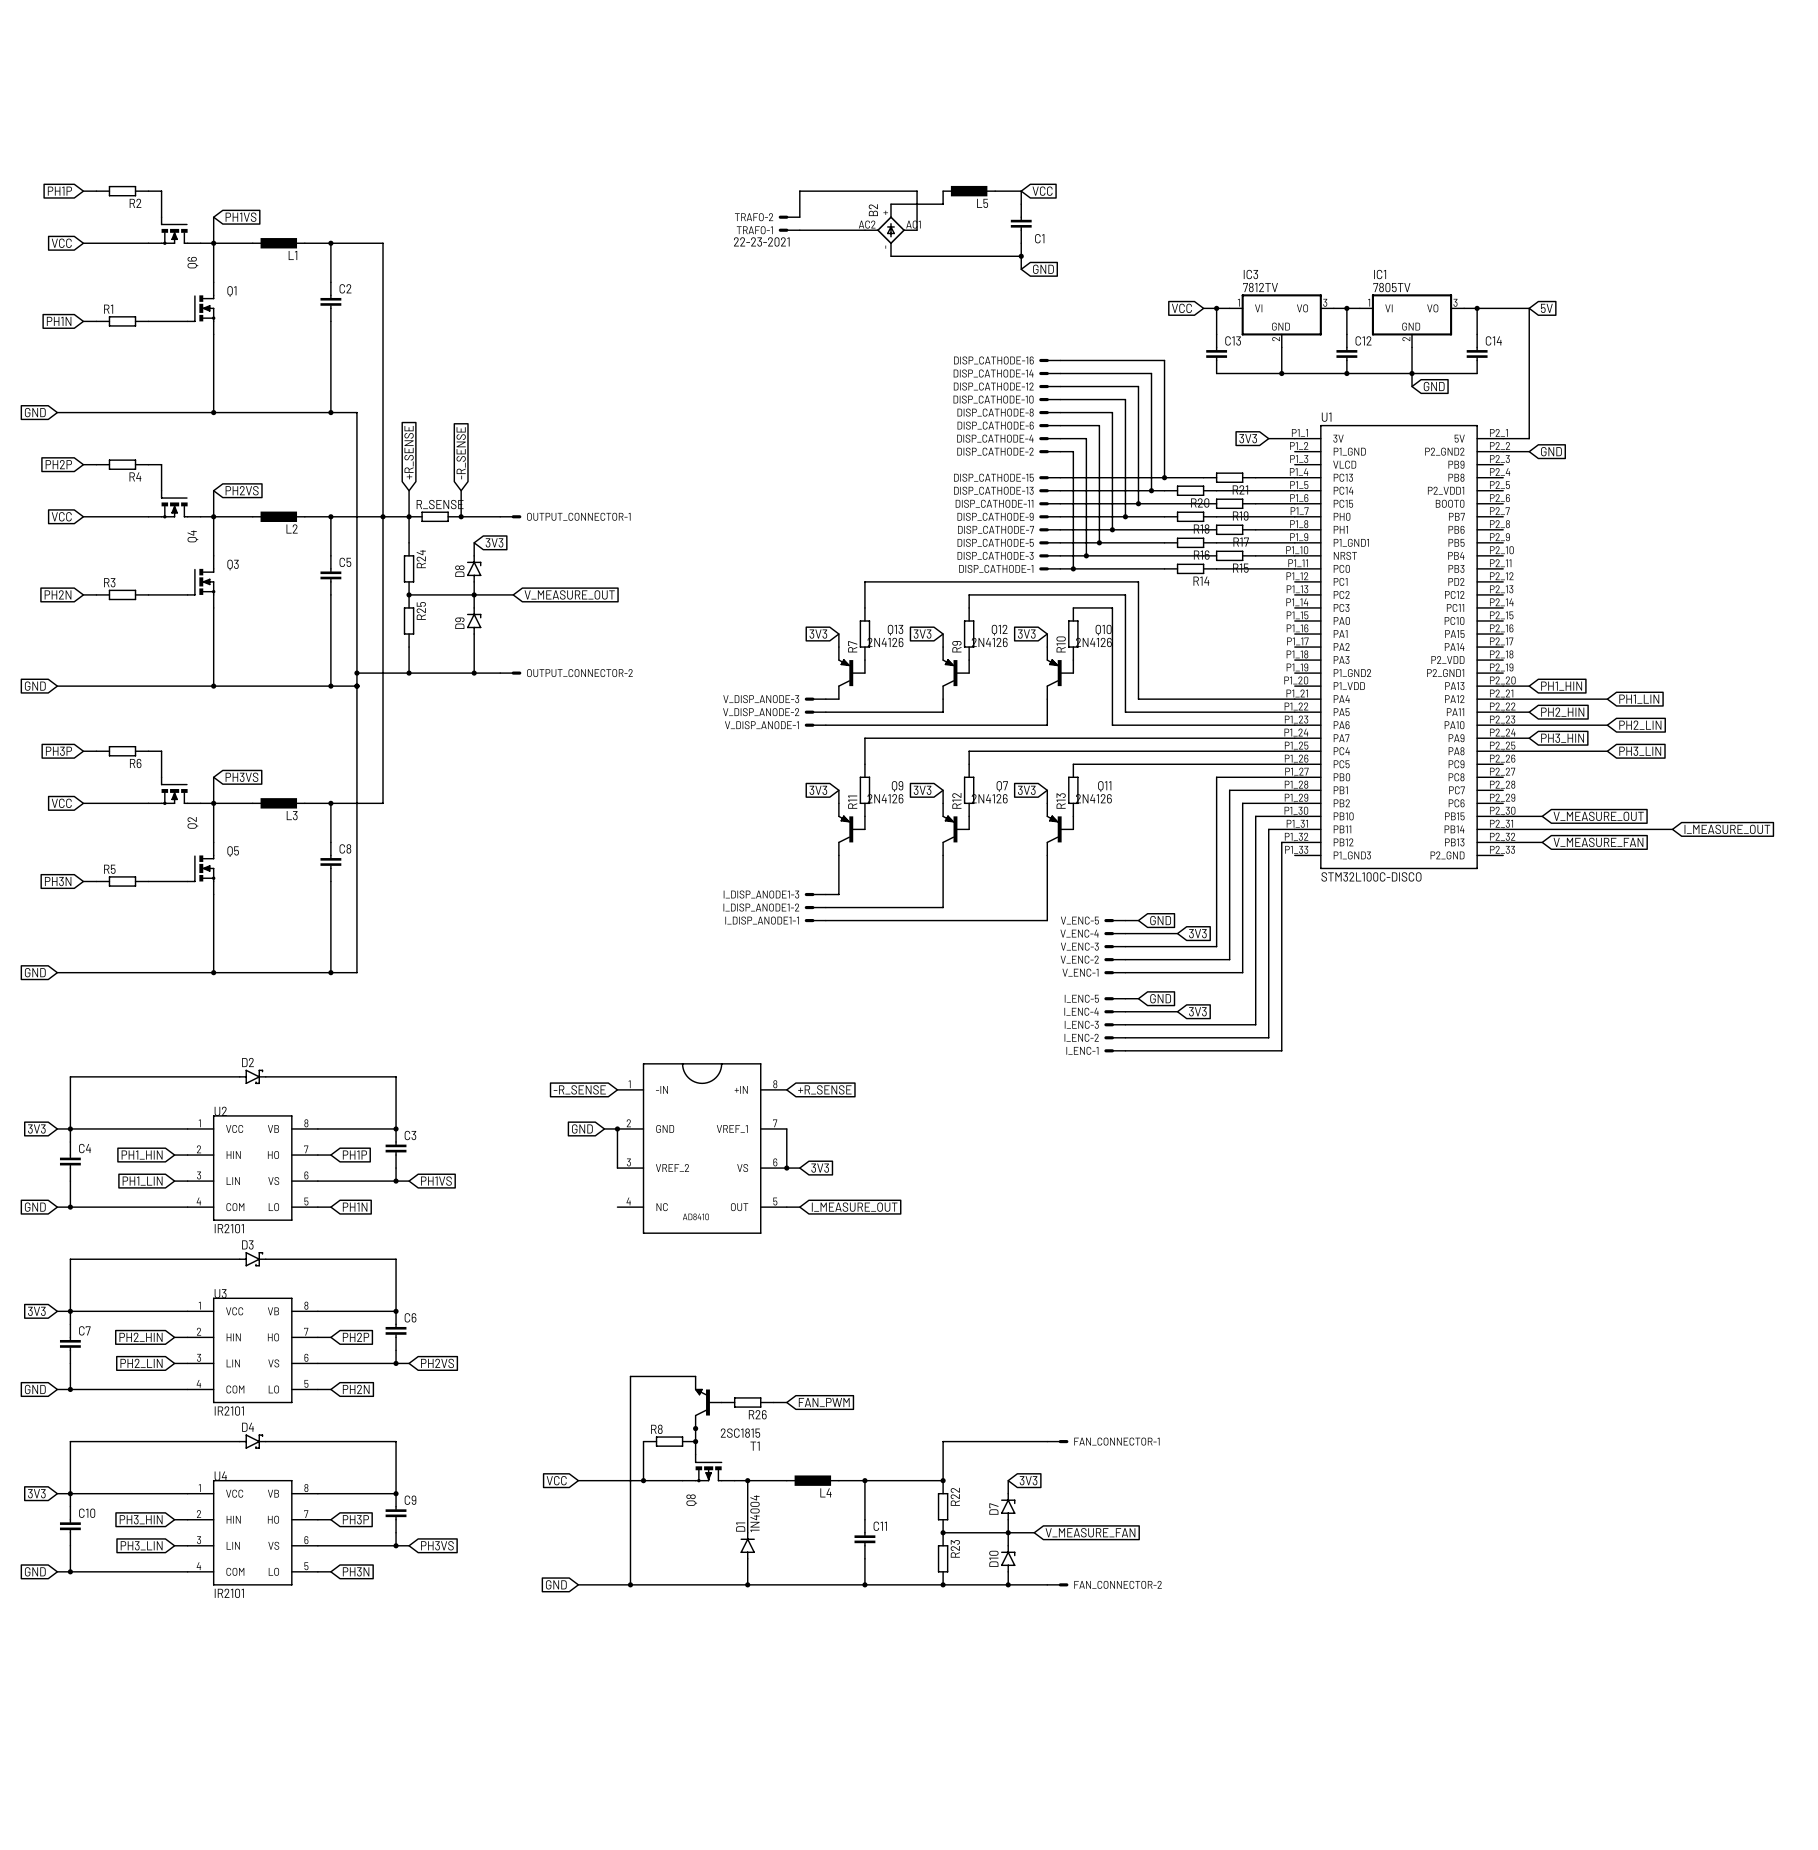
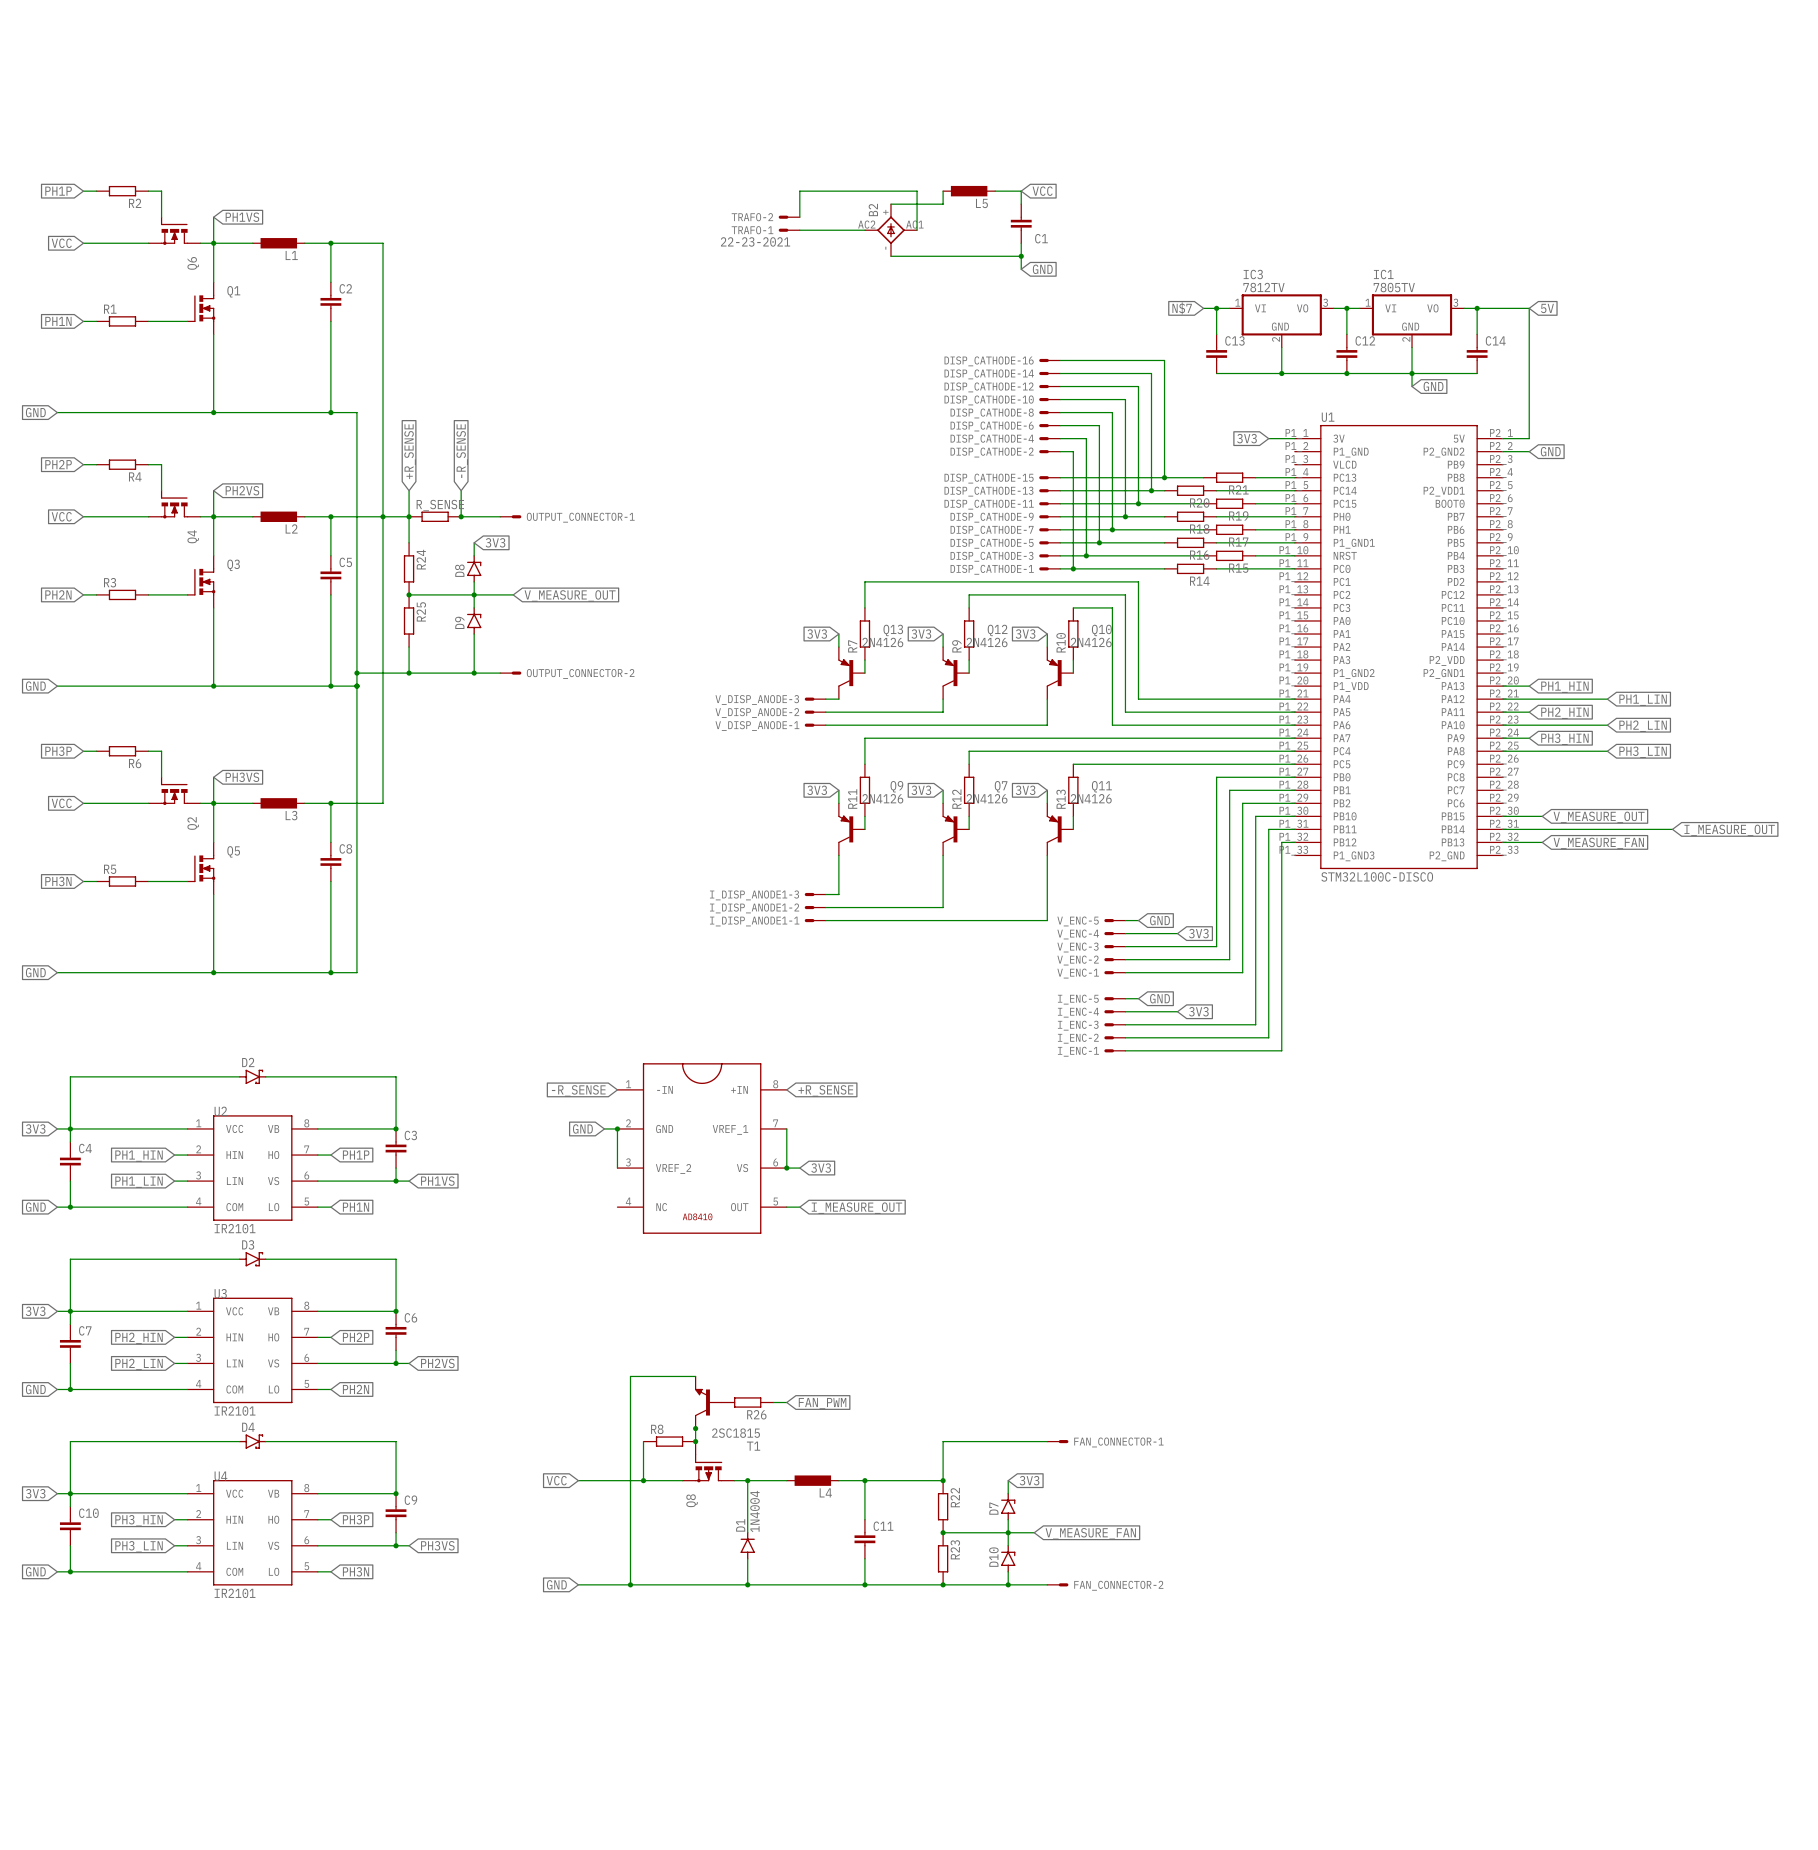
global label: VCC (1181, 308) -> N$7 (1182, 308)

